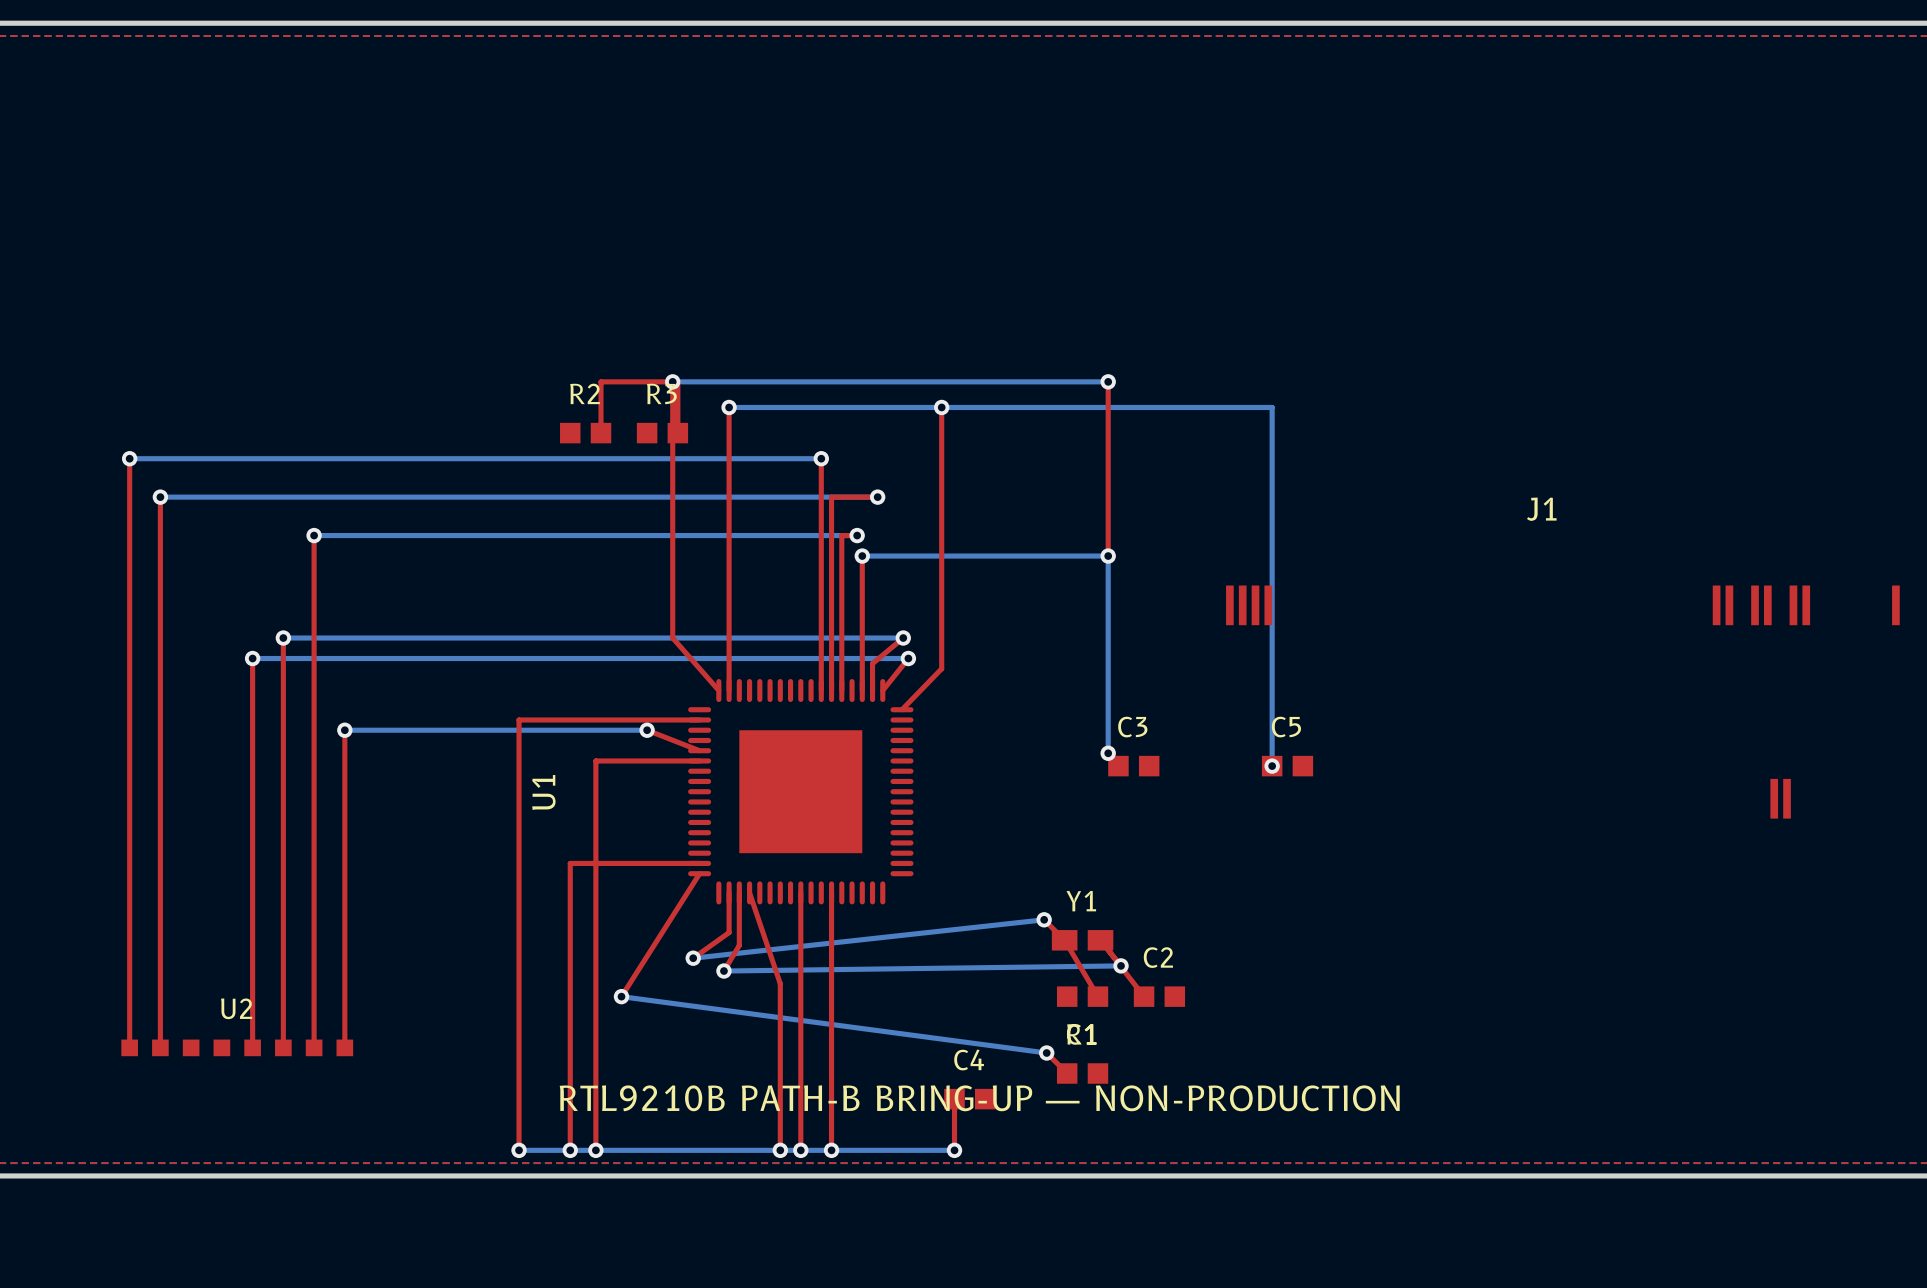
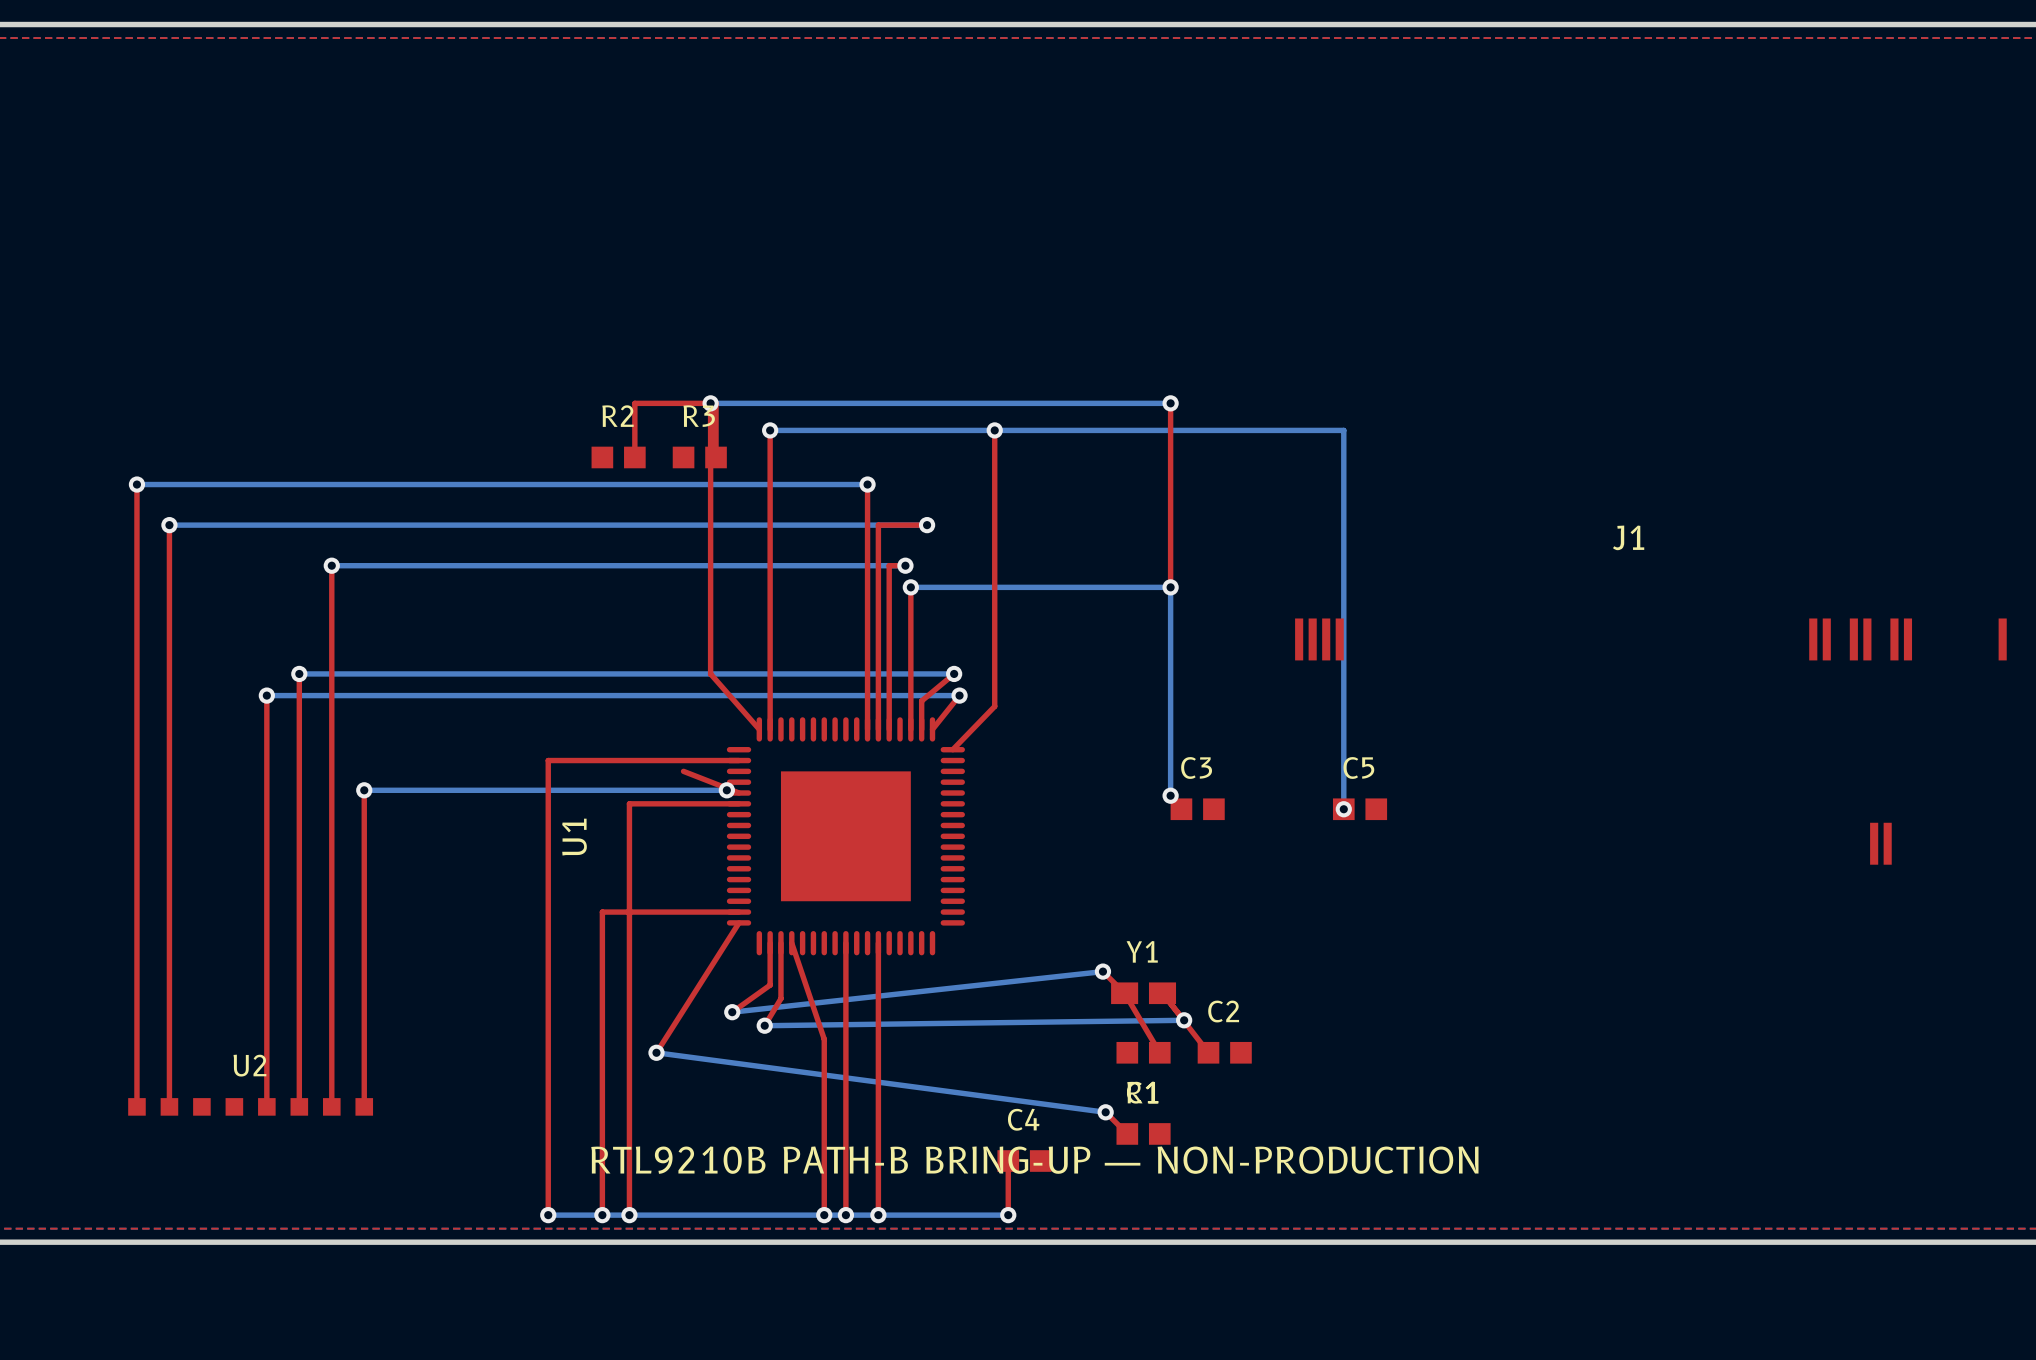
top track: (344, 730) (344, 748) -> none
bottom track: (344, 730) (647, 730) -> none
via position: (344, 730) -> (364, 790)
via position: (647, 730) -> (726, 790)
bottom track: none -> (364, 790) (726, 790)

